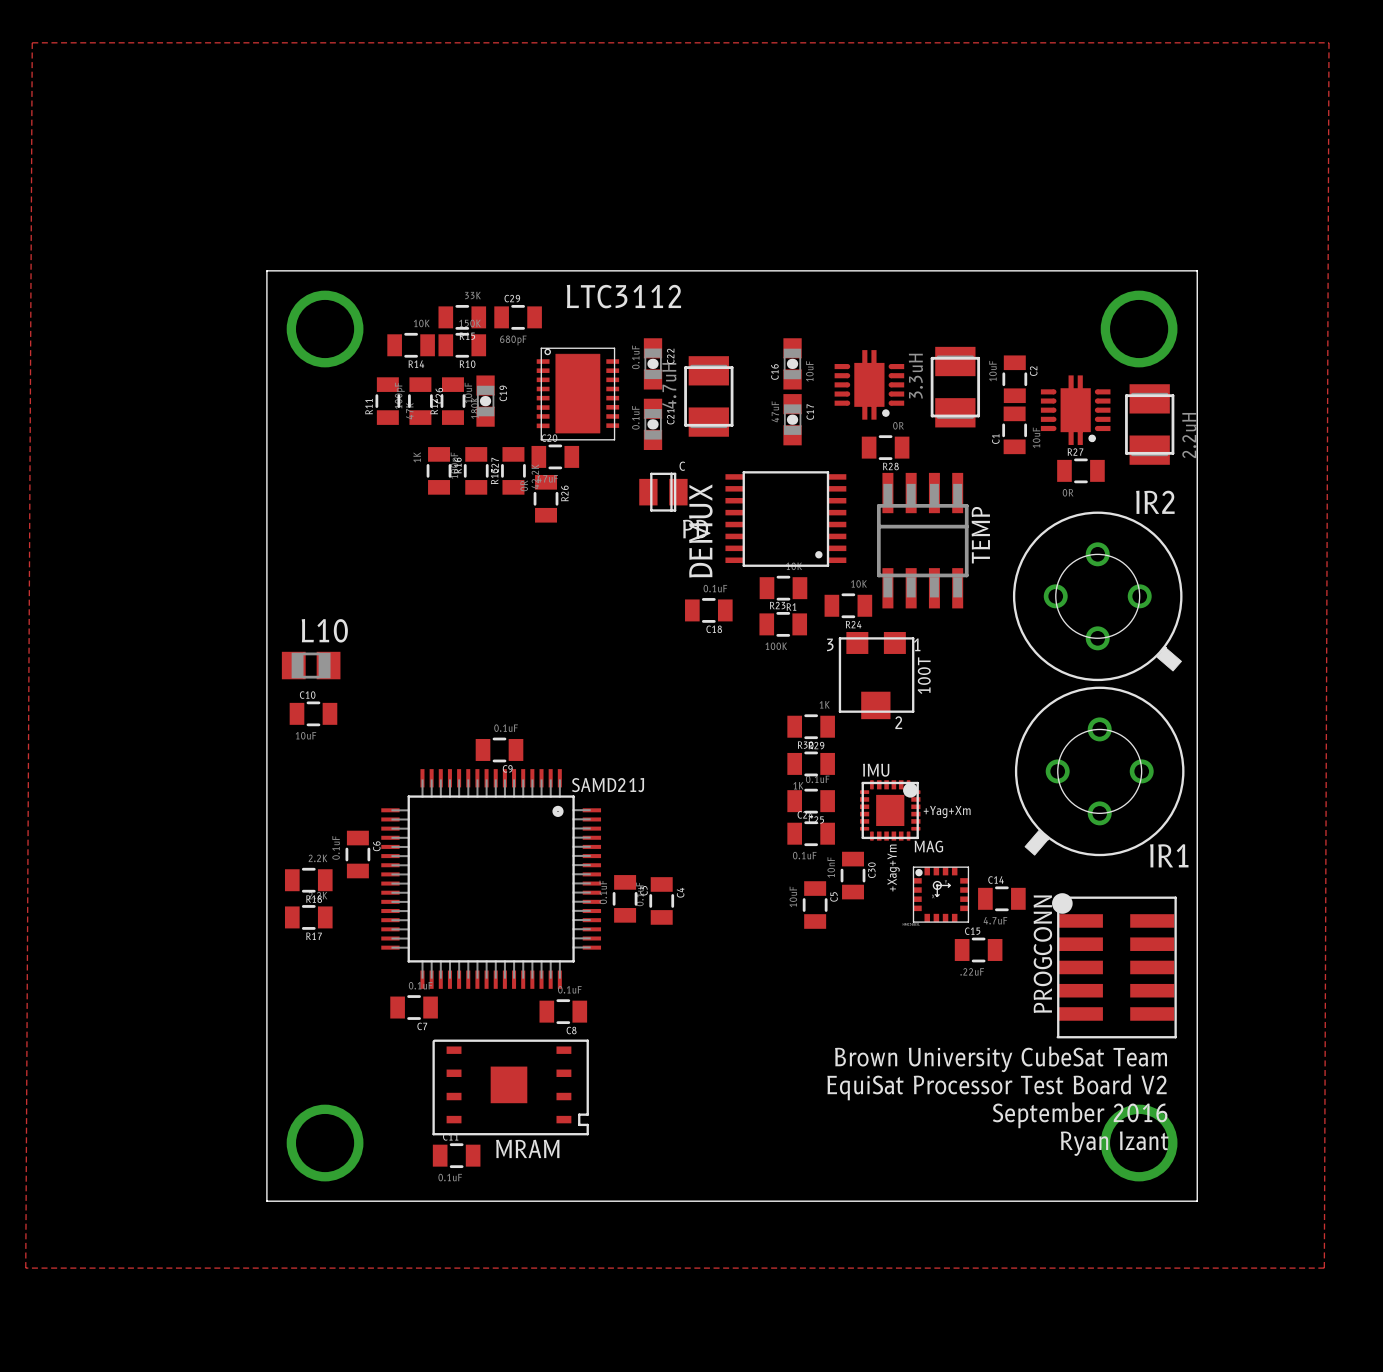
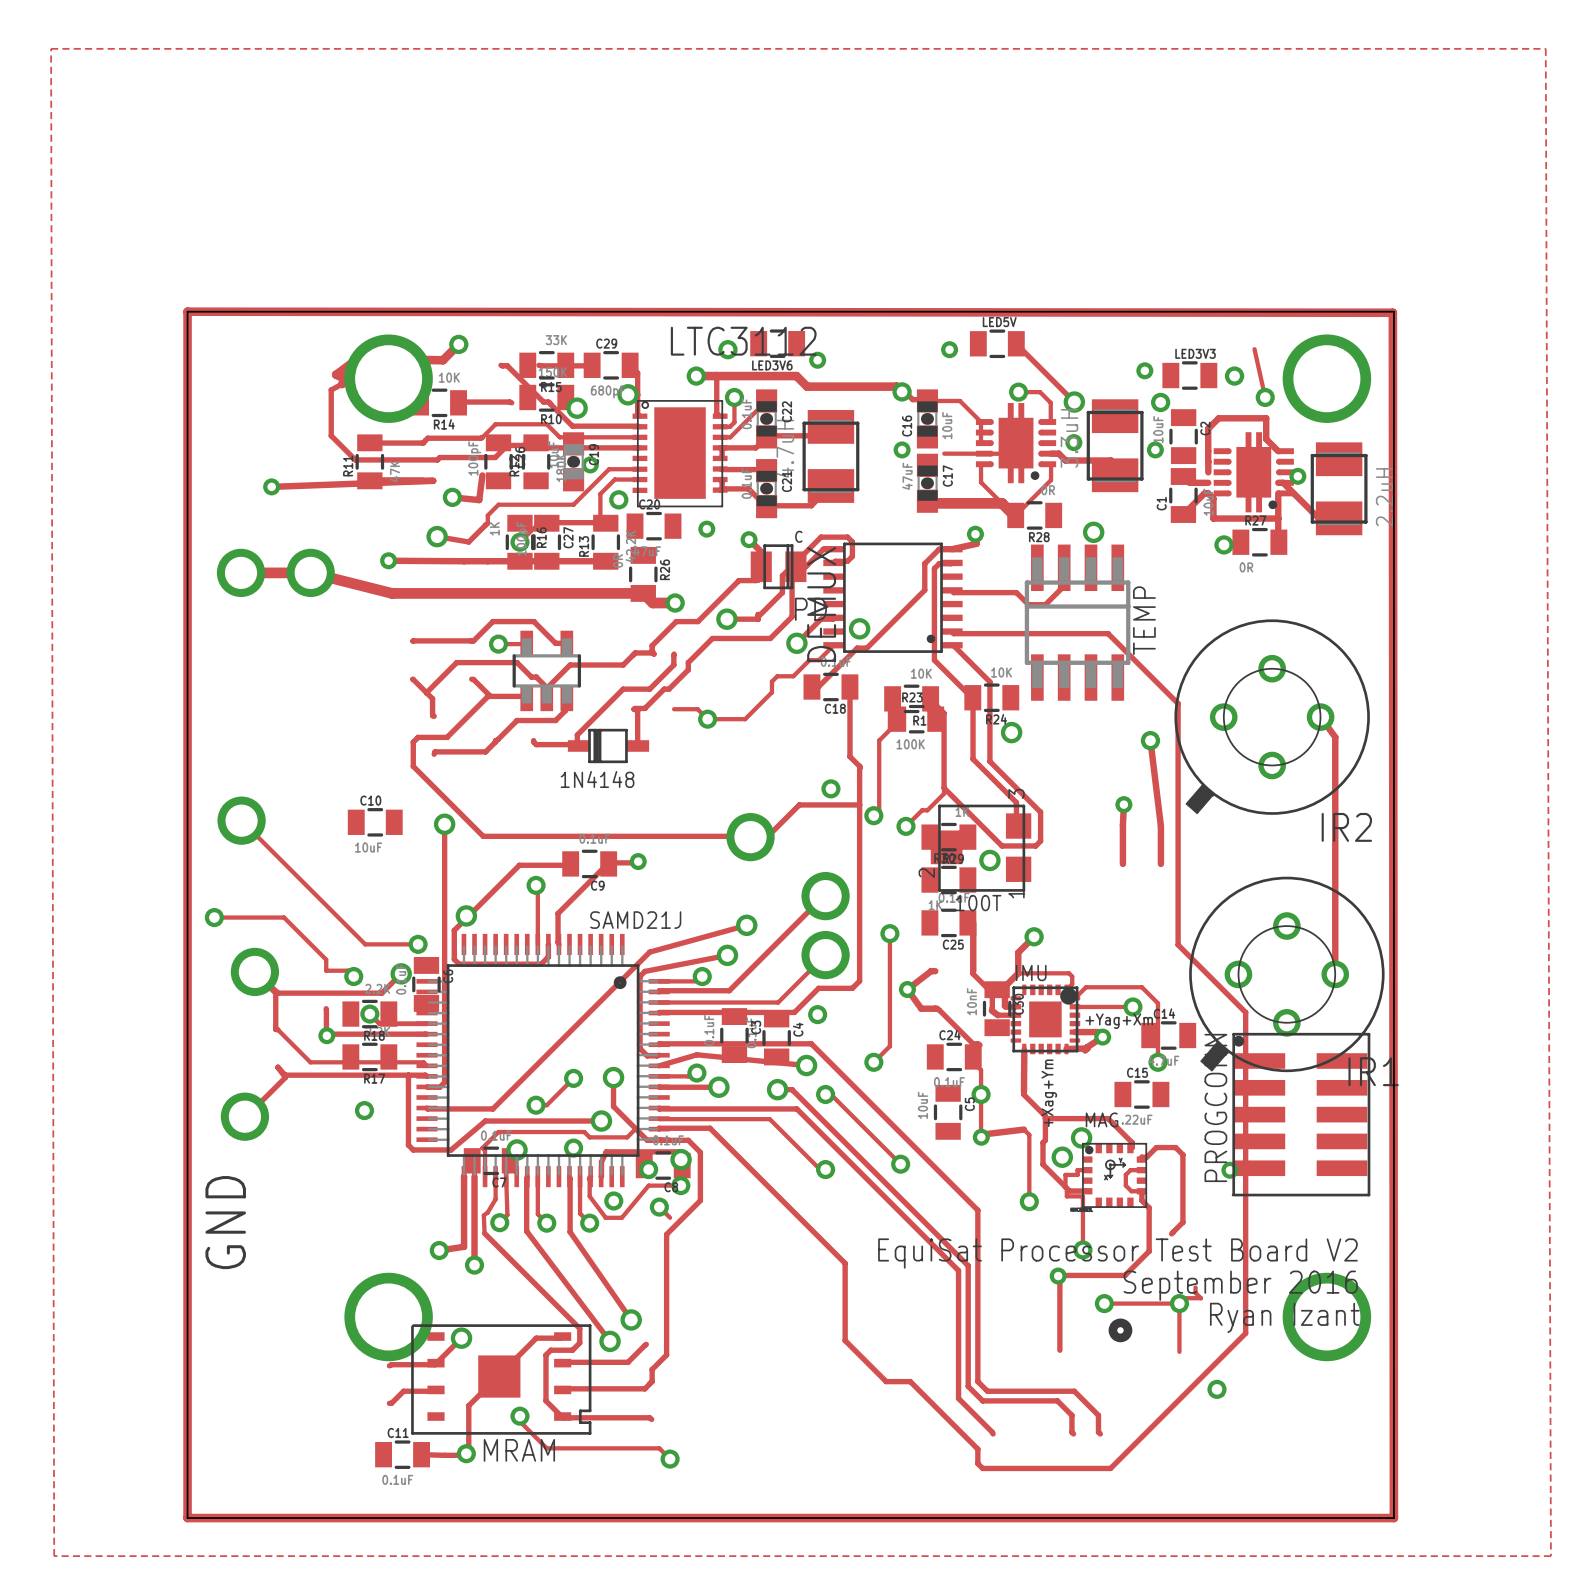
zone outline: (32, 42) (25, 1268) (1324, 1268) (1328, 42) -> (51, 48) (54, 1556) (1550, 1556) (1545, 48)
track: none -> (187, 311) (1392, 312) (1393, 1518) (187, 1518) (187, 311)
board edge: (266, 270) (266, 1201) (1197, 1201) -> (321, 311) (187, 311) (187, 1518) (1393, 1518) (1393, 1384)
LED3V6: none -> (777, 343)
LED5V: none -> (997, 343)
track: none -> (458, 344) (442, 360) (357, 359) (336, 374) (347, 380) (331, 389) (331, 435) (355, 459) (495, 457) (507, 445) (525, 443) (529, 447) (639, 447)
via: none -> (458, 344)
track: none -> (1016, 344) (1074, 402)
via: none -> (727, 349)
via: none -> (949, 349)
track: none -> (1254, 349) (1265, 397)
via: none -> (817, 360)
track: none -> (500, 365) (507, 365) (543, 402) (549, 402) (572, 426) (639, 426)
track: none -> (538, 365) (592, 365)
track: none -> (630, 365) (637, 373) (637, 414) (639, 416)
via: none -> (1144, 370)
track: none -> (696, 376) (796, 376) (807, 386) (896, 386) (912, 399) (959, 400) (981, 422) (981, 443)
via: none -> (696, 376)
track: none -> (716, 376) (716, 414) (720, 416)
LED3V3: none -> (1189, 375)
via: none -> (1234, 376)
C22 footprint: [643, 338, 663, 390] -> [756, 389, 778, 449]
C16 footprint: [783, 338, 802, 390] -> [916, 389, 939, 449]
via: none -> (902, 391)
track: none -> (1018, 392) (1040, 392) (1050, 402) (1050, 421)
via: none -> (1018, 392)
via: none -> (628, 394)
R14 position: (411, 345) -> (439, 402)
track: none -> (734, 397) (734, 422) (730, 426) (720, 426)
via: none -> (734, 397)
via: none -> (1265, 397)
track: none -> (766, 400) (730, 437) (720, 437)
track: none -> (458, 402) (511, 402)
via: none -> (1074, 402)
via: none -> (1160, 402)
via: none -> (577, 408)
track: none -> (830, 426) (823, 435) (767, 435) (755, 447) (720, 447) (722, 447) (722, 457) (720, 458)
track: none -> (639, 437) (559, 437) (546, 424) (495, 424) (480, 438) (427, 438) (422, 443) (369, 443)
via: none -> (1073, 442)
via: none -> (902, 449)
via: none -> (1155, 449)
track: none -> (1278, 451) (1266, 439) (1266, 418) (1218, 418) (1208, 428) (1208, 461)
C17 footprint: [783, 394, 802, 446] -> [916, 453, 939, 513]
track: none -> (944, 453) (1013, 453)
track: none -> (1051, 453) (1058, 453) (1065, 460) (1111, 460) (1115, 464)
C21 footprint: [643, 398, 663, 451] -> [756, 459, 778, 519]
R11 position: (387, 401) -> (369, 461)
track: none -> (1208, 461) (1208, 472)
via: none -> (590, 464)
track: none -> (981, 464) (981, 482) (1001, 503)
track: none -> (1051, 464) (1051, 480) (1015, 515) (1001, 503)
track: none -> (639, 469) (609, 469) (573, 504) (498, 504) (487, 515) (487, 523) (468, 541) (437, 536)
track: none -> (720, 468) (766, 470)
track: none -> (482, 475) (479, 500) (452, 497)
track: none -> (1183, 476) (1189, 482) (1208, 482)
via: none -> (1297, 476)
track: none -> (639, 479) (614, 479) (600, 493) (600, 517) (605, 523) (538, 523) (519, 542)
track: none -> (720, 479) (722, 481) (722, 488) (720, 490) (748, 488) (766, 506) (811, 505) (830, 486)
track: none -> (369, 480) (433, 480) (271, 486)
track: none -> (1278, 482) (1283, 482) (1318, 518) (1339, 518)
via: none -> (271, 486)
track: none -> (1278, 493) (1278, 542)
via: none -> (452, 497)
via: none -> (618, 499)
track: none -> (927, 501) (929, 503) (1001, 503)
track: none -> (1183, 514) (1204, 493) (1208, 493) (1213, 498) (1213, 518) (1278, 518)
via: none -> (706, 529)
via: none -> (1093, 532)
track: none -> (975, 534) (976, 543) (952, 549) (939, 549) (924, 563) (924, 590) (866, 648) (857, 648) (818, 686) (811, 687)
via: none -> (975, 534)
via: none -> (437, 536)
track: none -> (749, 539) (761, 551) (758, 579) (738, 580) (697, 621) (676, 621) (652, 645) (654, 654) (635, 652) (623, 665) (570, 665) (548, 686) (546, 698) (545, 686) (536, 677) (531, 677) (517, 662) (456, 662) (426, 692)
via: none -> (749, 539)
via: none -> (519, 542)
C27 position: (476, 470) -> (546, 542)
via: none -> (1223, 544)
track: none -> (833, 549) (823, 549) (792, 580) (792, 616) (770, 638) (712, 638) (688, 662) (688, 669) (669, 689) (664, 689) (644, 708) (633, 709) (637, 710) (638, 745)
track: none -> (388, 560) (605, 561)
via: none -> (388, 560)
track: none -> (833, 562) (847, 561) (852, 556) (852, 541) (847, 537) (821, 537) (782, 575) (782, 592) (758, 616) (758, 614) (758, 619) (726, 619)
track: none -> (952, 562) (939, 563) (934, 568) (934, 660) (972, 697) (973, 759) (1016, 802) (1016, 824) (1018, 826)
track: none -> (241, 572) (310, 572) (392, 593) (643, 593) (652, 602) (675, 602)
via: none -> (241, 572)
via: none -> (310, 572)
track: none -> (1064, 573) (1062, 573) (1062, 587) (1045, 604) (1028, 604) (1016, 592) (953, 592) (952, 590)
DEMUX position: (785, 519) -> (892, 597)
via: none -> (675, 602)
track: none -> (833, 617) (821, 619) (796, 643)
via: none -> (726, 619)
via: none -> (859, 628)
track: none -> (952, 631) (953, 633) (1108, 633) (1178, 703) (1178, 944) (1245, 1012) (1245, 1333) (1110, 1468) (982, 1468) (977, 1463) (977, 1449) (910, 1381) (886, 1381) (845, 1340) (845, 1263) (710, 1128) (659, 1129)
track: none -> (412, 641) (471, 641) (492, 621) (533, 621) (555, 643) (566, 643)
track: none -> (526, 643) (498, 644)
via: none -> (796, 643)
via: none -> (498, 644)
track: none -> (833, 645) (818, 660) (809, 660) (793, 676) (777, 676) (771, 681) (771, 692) (745, 719) (707, 719) (697, 709) (674, 709)
track: none -> (952, 645) (989, 681) (989, 761) (1040, 812) (1040, 841) (1035, 845) (1001, 845) (944, 788)
track: none -> (674, 654) (673, 665) (649, 689) (623, 689) (577, 734) (578, 745) (536, 744) (533, 740)
part: none -> (546, 670)
R1 position: (783, 588) -> (911, 698)
track: none -> (412, 679) (432, 698) (432, 715) (434, 716)
track: none -> (471, 679) (490, 696)
track: none -> (849, 687) (849, 756) (860, 767) (859, 981) (852, 988) (818, 988) (794, 1012) (659, 1013)
IR2 rotation: 0° (1097, 596) -> 90° clockwise (1272, 717)
track: none -> (526, 698) (526, 696) (488, 696) (447, 737) (418, 737) (413, 742) (413, 766) (483, 836) (767, 836) (799, 804) (859, 804)
track: none -> (566, 698) (565, 698) (565, 710) (555, 720) (517, 720) (485, 751) (434, 751) (434, 754)
track: none -> (892, 698) (889, 703) (889, 729) (879, 740) (879, 810) (873, 815)
track: none -> (930, 698) (944, 713) (944, 788)
C18 position: (708, 610) -> (830, 687)
track: none -> (1320, 717) (1335, 737) (1335, 974)
via: none -> (707, 719)
100T footprint: [838, 632, 915, 720] -> [930, 804, 1032, 892]
via: none -> (1011, 732)
track: none -> (1150, 740) (1160, 826) (1160, 863)
via: none -> (1150, 740)
1N4148: none -> (608, 745)
L10: (311, 665) -> none
100T name position: 100T (924, 675) -> 100T (978, 903)
via: none -> (830, 788)
track: none -> (944, 788) (944, 793) (927, 810) (922, 810) (906, 826)
track: none -> (1123, 804) (1122, 863)
via: none -> (1123, 804)
via: none -> (873, 815)
track: none -> (241, 820) (365, 944) (418, 944)
via: none -> (241, 820)
track: none -> (444, 824) (444, 1082) (439, 1087) (427, 1086)
via: none -> (444, 824)
via: none -> (906, 826)
via: none -> (750, 837)
via: none -> (989, 860)
track: none -> (638, 861) (611, 862) (606, 865) (558, 913) (558, 944)
via: none -> (638, 861)
track: none -> (570, 863) (519, 865) (454, 930) (454, 959) (459, 964) (541, 964) (548, 956) (548, 944)
track: none -> (536, 885) (537, 887) (537, 944)
via: none -> (536, 885)
IR1 position: (1099, 771) -> (1286, 974)
track: none -> (825, 896) (729, 990) (659, 991)
via: none -> (825, 896)
SAMD21J name position: SAMD21J (608, 785) -> SAMD21J (635, 920)
via: none -> (466, 915)
track: none -> (214, 917) (284, 917) (326, 959) (326, 970) (347, 970) (353, 976)
via: none -> (214, 917)
track: none -> (973, 922) (973, 973) (992, 993) (991, 1010) (997, 1015) (1015, 1015)
track: none -> (746, 925) (649, 952) (492, 1108) (427, 1108)
via: none -> (746, 925)
track: none -> (889, 933) (889, 1046) (873, 1062)
via: none -> (889, 933)
IMU position: (890, 810) -> (1045, 1019)
track: none -> (1034, 936) (1018, 952) (1018, 973)
via: none -> (1034, 936)
via: none -> (418, 944)
track: none -> (727, 955) (644, 971) (640, 976) (640, 1048) (647, 1055) (659, 1055)
via: none -> (727, 955)
track: none -> (825, 955) (778, 1002) (659, 1002)
via: none -> (825, 955)
C24 position: (811, 833) -> (954, 1056)
via: none -> (254, 971)
track: none -> (935, 971) (931, 971) (907, 989) (921, 1008) (937, 1008)
track: none -> (1018, 973) (1004, 986) (1004, 1005) (1015, 1006)
track: none -> (1018, 973) (1069, 973) (1072, 976) (1072, 984) (1066, 989)
track: none -> (401, 973) (381, 993) (278, 993) (254, 971) (275, 993) (275, 1029) (310, 1062) (423, 1062) (427, 1065)
via: none -> (401, 973)
via: none -> (353, 976)
track: none -> (702, 976) (697, 981) (659, 981)
via: none -> (702, 976)
via: none -> (907, 989)
track: none -> (1074, 998) (1086, 987) (1141, 987) (1158, 1003) (1158, 1062)
track: none -> (1075, 1006) (1132, 1006)
via: none -> (1132, 1006)
track: none -> (326, 1008) (326, 1035) (328, 1034) (427, 1034)
track: none -> (935, 1008) (939, 1010) (973, 1043) (980, 1045)
SAMD21J position: (491, 878) -> (543, 1060)
track: none -> (369, 1014) (379, 1023) (427, 1023) (379, 1023)
via: none -> (369, 1014)
via: none -> (817, 1014)
MAG position: (940, 894) -> (1114, 1175)
track: none -> (1074, 1032) (1097, 1032) (1102, 1037) (1087, 1047)
via: none -> (326, 1035)
via: none -> (1102, 1037)
drawing position: (1062, 903) -> (1120, 1330)
C5 position: (815, 905) -> (948, 1112)
track: none -> (659, 1044) (811, 1043) (977, 1210) (977, 1381) (987, 1391) (1074, 1391) (1098, 1415) (1098, 1432) (1100, 1433)
track: none -> (1087, 1047) (1085, 1050) (1087, 1048) (1066, 1048)
track: none -> (1024, 1048) (1023, 1094) (1045, 1116) (1043, 1164) (1069, 1190) (1087, 1191) (1066, 1191) (1066, 1196) (1082, 1196) (1082, 1249)
track: none -> (976, 1053) (976, 1065) (981, 1070) (981, 1132)
via: none -> (873, 1062)
via: none -> (1158, 1062)
track: none -> (806, 1065) (696, 1054) (659, 1065)
via: none -> (806, 1065)
track: none -> (696, 1073) (688, 1076) (659, 1076)
via: none -> (696, 1073)
track: none -> (408, 1075) (408, 1145) (413, 1149) (451, 1149) (485, 1121) (601, 1121)
track: none -> (427, 1076) (285, 1075) (278, 1067) (285, 1077) (244, 1116)
track: none -> (613, 1077) (613, 1106) (647, 1140) (688, 1140) (700, 1152) (700, 1200) (666, 1234) (666, 1355) (652, 1369) (652, 1381) (644, 1388) (562, 1389)
via: none -> (613, 1077)
track: none -> (573, 1078) (546, 1105) (536, 1105)
via: none -> (573, 1078)
track: none -> (659, 1087) (718, 1087)
via: none -> (718, 1087)
track: none -> (777, 1089) (792, 1089) (968, 1265) (968, 1386) (982, 1400) (1057, 1400) (1071, 1415) (1073, 1433)
via: none -> (777, 1089)
track: none -> (825, 1094) (830, 1094) (900, 1164)
via: none -> (825, 1094)
via: none -> (981, 1094)
via: none -> (536, 1105)
track: none -> (659, 1108) (796, 1108) (958, 1270) (958, 1398) (993, 1433)
via: none -> (364, 1110)
via: none -> (244, 1116)
track: none -> (659, 1118) (769, 1119) (820, 1169) (825, 1169)
track: none -> (1045, 1118) (1108, 1118) (1132, 1142) (1130, 1148)
via: none -> (601, 1121)
track: none -> (635, 1128) (627, 1137) (589, 1137) (584, 1132) (498, 1132) (482, 1148) (485, 1150) (485, 1176)
track: none -> (981, 1134) (1023, 1129) (1029, 1134) (1029, 1201)
via: none -> (981, 1137)
via: none -> (1081, 1137)
via: none -> (573, 1148)
via: none -> (517, 1149)
via: none -> (1062, 1157)
track: none -> (681, 1159) (678, 1151) (606, 1151) (601, 1162) (601, 1176)
via: none -> (681, 1159)
track: none -> (1141, 1159) (1141, 1157) (1146, 1157) (1156, 1147) (1175, 1147) (1182, 1154) (1182, 1222) (1171, 1233)
via: none -> (900, 1164)
via: none -> (648, 1169)
via: none -> (825, 1169)
track: none -> (1087, 1170) (1077, 1170) (1077, 1174) (1065, 1174) (1065, 1186)
track: none -> (1141, 1170) (1130, 1170) (1125, 1174) (1125, 1185) (1131, 1191) (1141, 1191) (1141, 1200) (1149, 1207) (1149, 1251) (1125, 1275) (1058, 1276) (1059, 1277) (1059, 1350)
via: none -> (1229, 1170)
track: none -> (464, 1176) (464, 1246) (439, 1250)
track: none -> (474, 1176) (474, 1265)
track: none -> (506, 1176) (507, 1215) (499, 1222)
track: none -> (527, 1176) (526, 1231) (610, 1341)
track: none -> (537, 1176) (537, 1214) (546, 1223)
track: none -> (569, 1176) (570, 1232) (631, 1319)
track: none -> (580, 1176) (580, 1213) (589, 1223)
track: none -> (589, 1178) (590, 1176) (589, 1196) (605, 1217) (621, 1217) (648, 1185) (680, 1185)
track: none -> (495, 1184) (495, 1176) (495, 1199) (483, 1215) (484, 1233) (579, 1328) (579, 1342) (572, 1350) (550, 1350) (545, 1355) (545, 1400) (562, 1417) (649, 1417) (651, 1419)
via: none -> (680, 1185)
via: none -> (613, 1201)
via: none -> (1029, 1201)
track: none -> (659, 1207) (670, 1217)
via: none -> (659, 1207)
text: Brown University CubeSat Team (1001, 1059) -> none
via: none -> (499, 1222)
via: none -> (546, 1223)
via: none -> (589, 1223)
text: none -> GND (225, 1222)
via: none -> (1082, 1249)
via: none -> (439, 1250)
MRAM position: (510, 1087) -> (501, 1379)
via: none -> (474, 1265)
via: none -> (1058, 1276)
track: none -> (1195, 1287) (1195, 1292) (1200, 1298) (1184, 1298) (1179, 1303)
track: none -> (1104, 1303) (1179, 1303)
via: none -> (1104, 1303)
track: none -> (1179, 1303) (1179, 1351)
via: none -> (1179, 1303)
via: none -> (631, 1319)
C11 position: (456, 1155) -> (402, 1454)
track: none -> (562, 1336) (536, 1338) (468, 1405) (468, 1455)
track: none -> (461, 1338) (434, 1364) (389, 1365)
via: none -> (461, 1338)
via: none -> (610, 1341)
track: none -> (646, 1344) (628, 1362) (562, 1363)
via: none -> (1216, 1389)
track: none -> (436, 1389) (403, 1391) (389, 1403)
track: none -> (519, 1416) (519, 1421) (546, 1448) (659, 1448) (670, 1459)
via: none -> (519, 1416)
via: none -> (466, 1453)
track: none -> (421, 1454) (468, 1455)
via: none -> (670, 1459)

